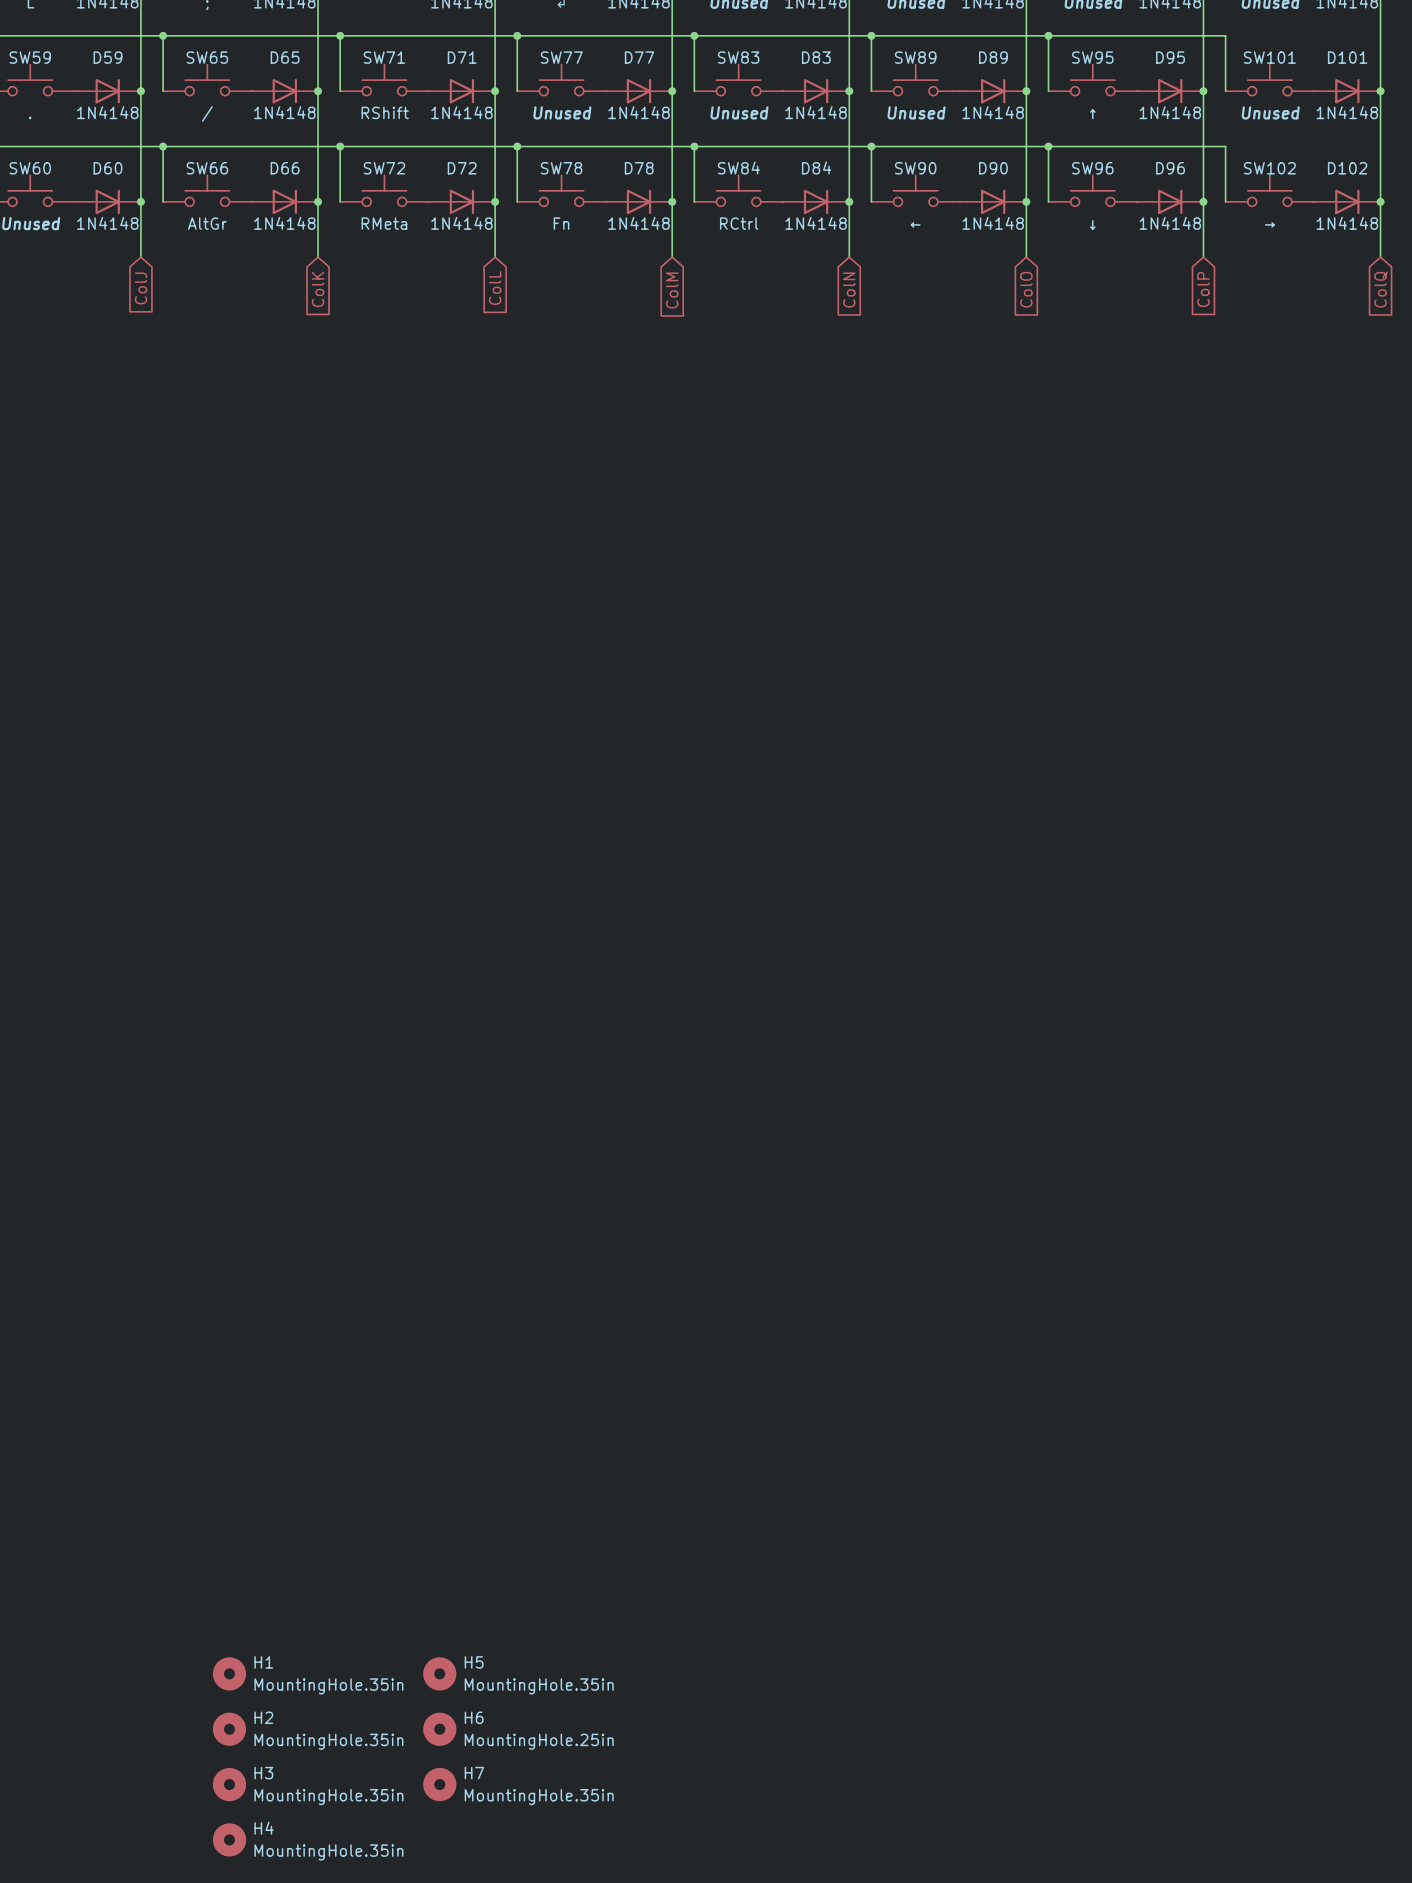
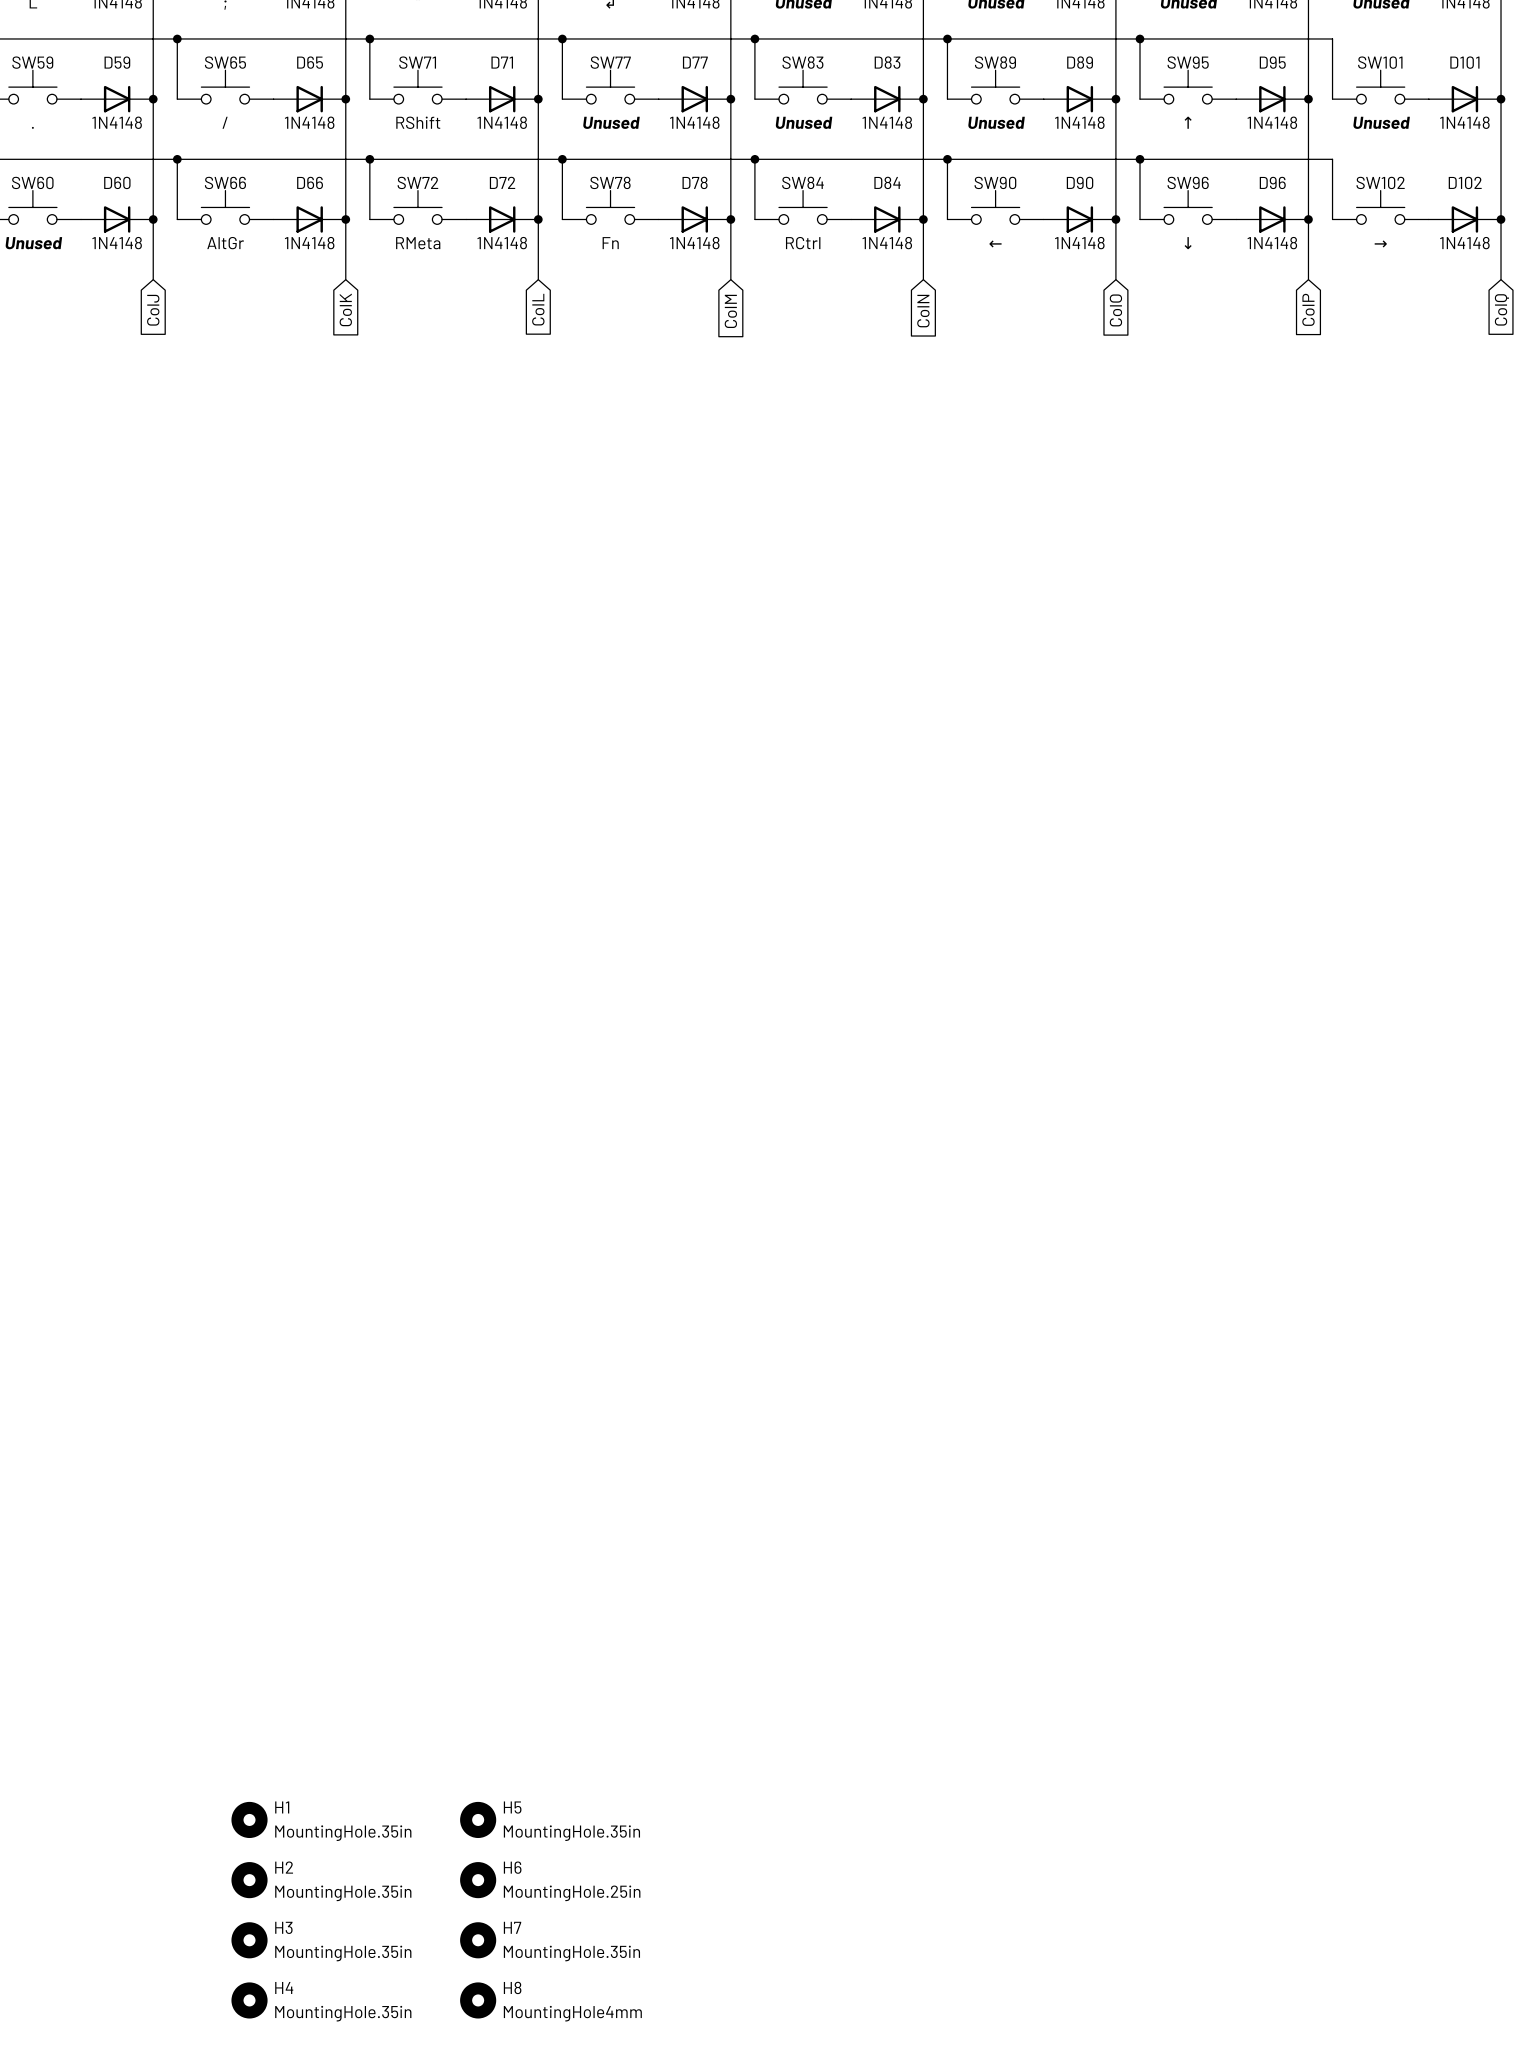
H8: none -> MountingHole4mm (478, 2000)

